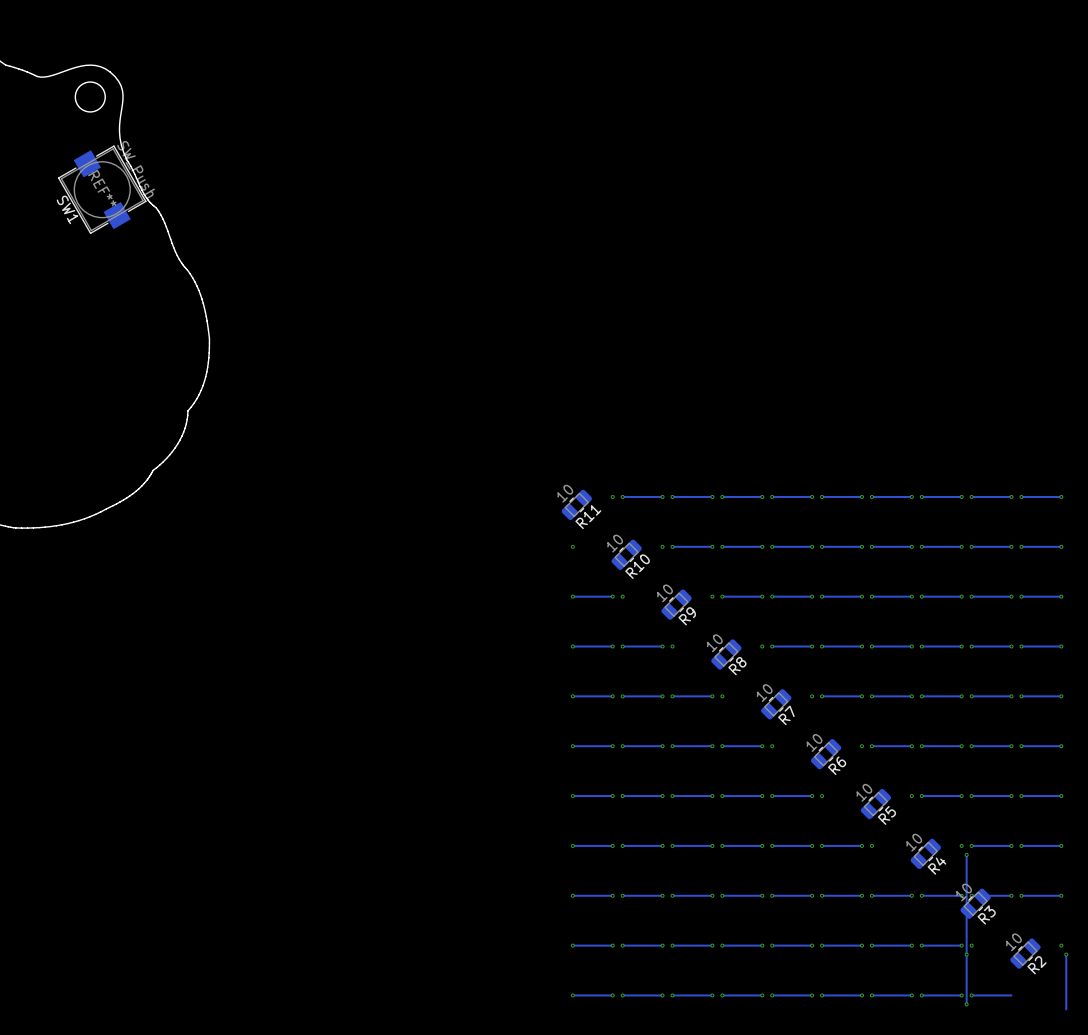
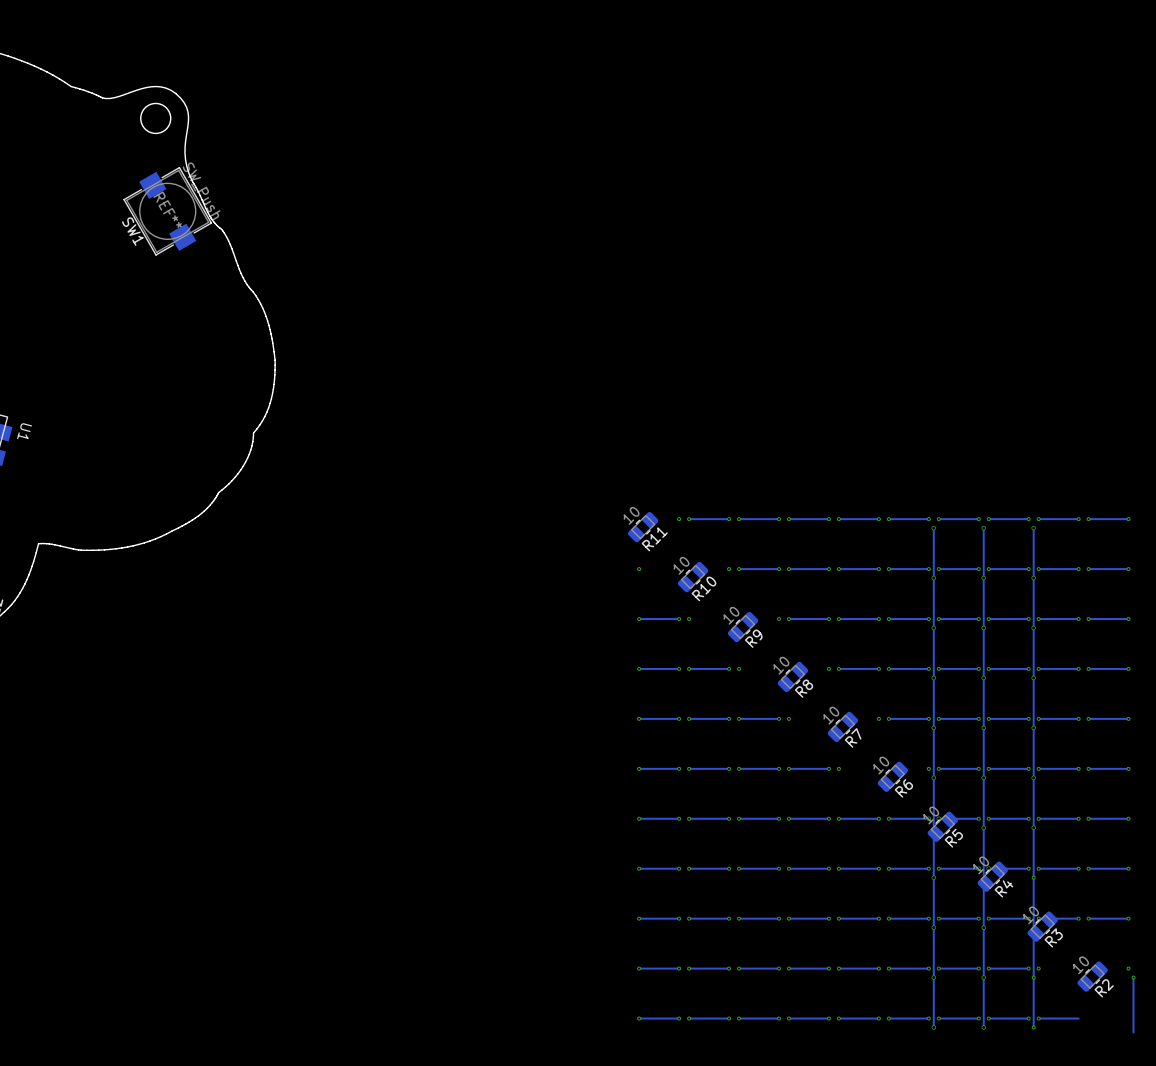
track: none -> (933, 528) (933, 831) (935, 833) (933, 835) (933, 1027)
via: none -> (933, 528)
track: none -> (983, 528) (983, 881) (985, 883) (983, 885) (983, 1027)
via: none -> (983, 528)
track: none -> (1033, 528) (1033, 877)
via: none -> (1033, 528)
via: none -> (933, 578)
via: none -> (983, 578)
via: none -> (1033, 578)
via: none -> (933, 628)
via: none -> (983, 628)
via: none -> (1033, 628)
via: none -> (933, 677)
via: none -> (983, 677)
via: none -> (1033, 677)
via: none -> (933, 727)
via: none -> (983, 727)
via: none -> (1033, 727)
via: none -> (933, 777)
via: none -> (983, 777)
via: none -> (1033, 777)
track: none -> (928, 818) (888, 818)
via: none -> (928, 818)
via: none -> (938, 818)
track: none -> (978, 818) (938, 818)
via: none -> (983, 827)
via: none -> (1033, 827)
track: none -> (978, 868) (938, 868)
via: none -> (978, 868)
via: none -> (988, 868)
track: none -> (1028, 868) (988, 868)
via: none -> (933, 877)
via: none -> (933, 927)
via: none -> (983, 927)
via: none -> (933, 977)
via: none -> (983, 977)
via: none -> (933, 1027)
via: none -> (983, 1027)

